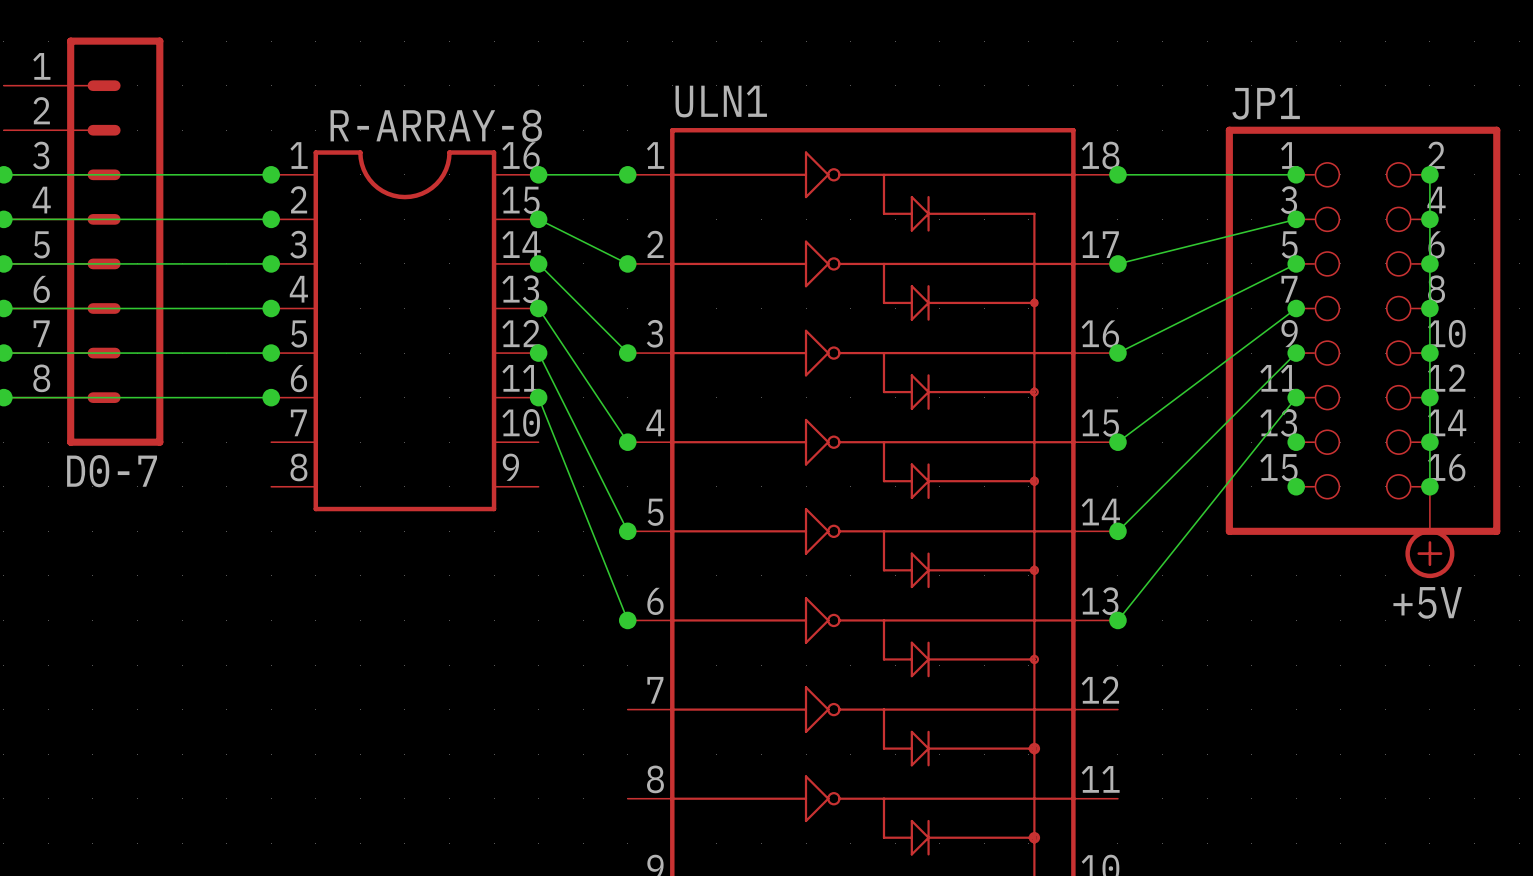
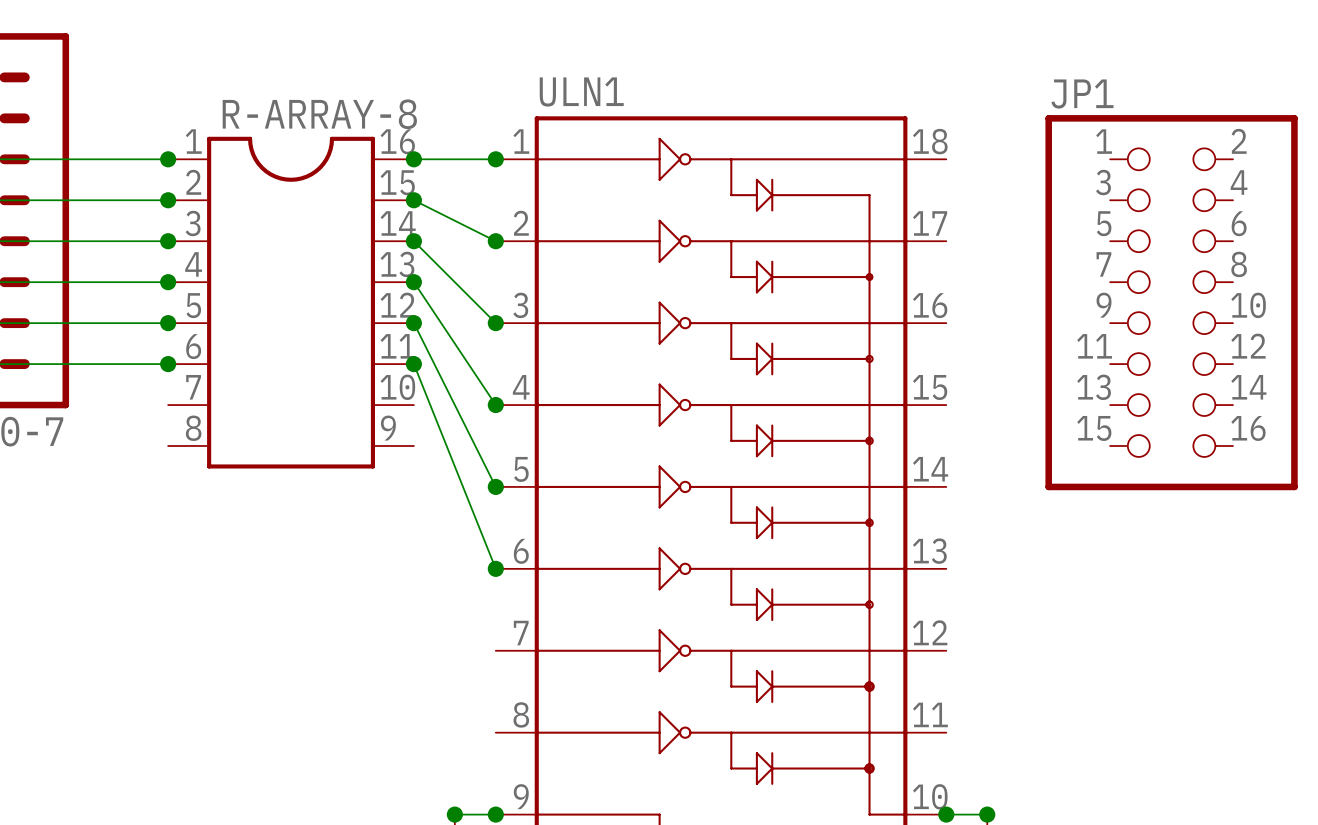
wire: (1117, 174) (1296, 174) -> none
junction: (1117, 174) -> none
junction: (1296, 174) -> none
wire: (1429, 174) (1429, 486) -> none
junction: (1429, 174) -> none
wire: (1296, 219) (1117, 263) -> none
junction: (1296, 219) -> none
junction: (1429, 219) -> none
junction: (1117, 263) -> none
wire: (1296, 263) (1117, 353) -> none
junction: (1296, 263) -> none
junction: (1429, 263) -> none
wire: (1296, 308) (1117, 442) -> none
junction: (1296, 308) -> none
junction: (1429, 308) -> none
junction: (1117, 353) -> none
wire: (1296, 353) (1117, 531) -> none
junction: (1296, 353) -> none
junction: (1429, 353) -> none
wire: (1296, 397) (1117, 620) -> none
junction: (1296, 397) -> none
junction: (1429, 397) -> none
junction: (1117, 442) -> none
junction: (1296, 442) -> none
junction: (1429, 442) -> none
junction: (1296, 486) -> none
junction: (1429, 486) -> none
junction: (1117, 531) -> none
power symbol: +5V (1429, 532) -> none
junction: (1117, 620) -> none

